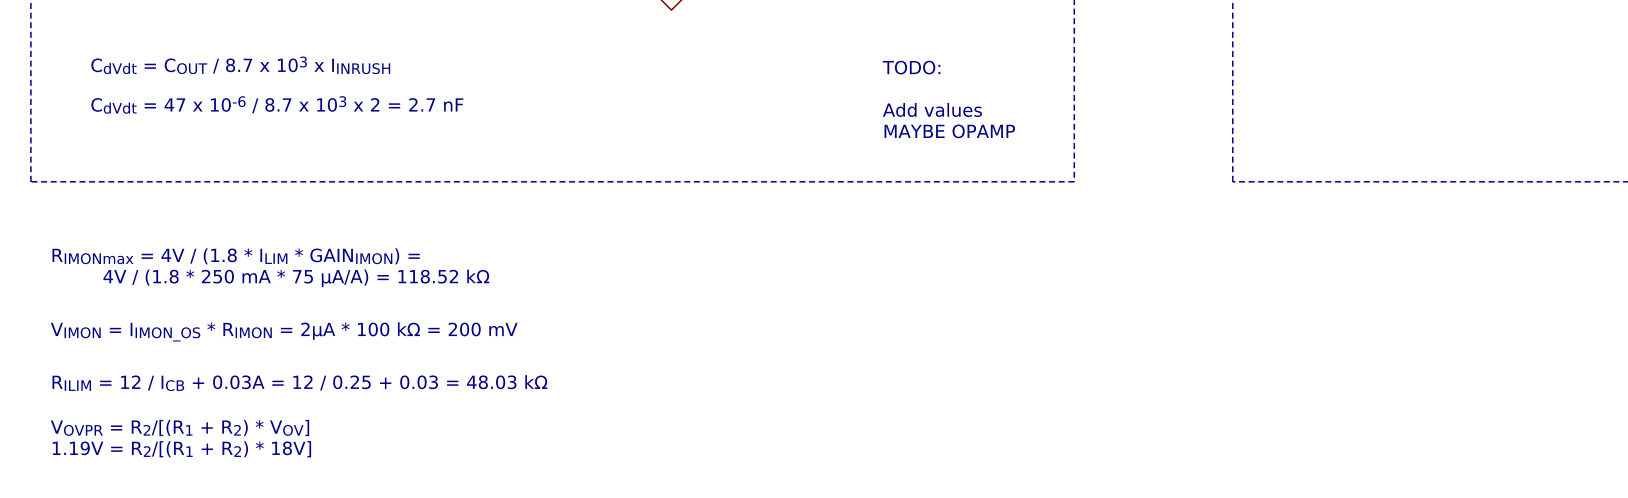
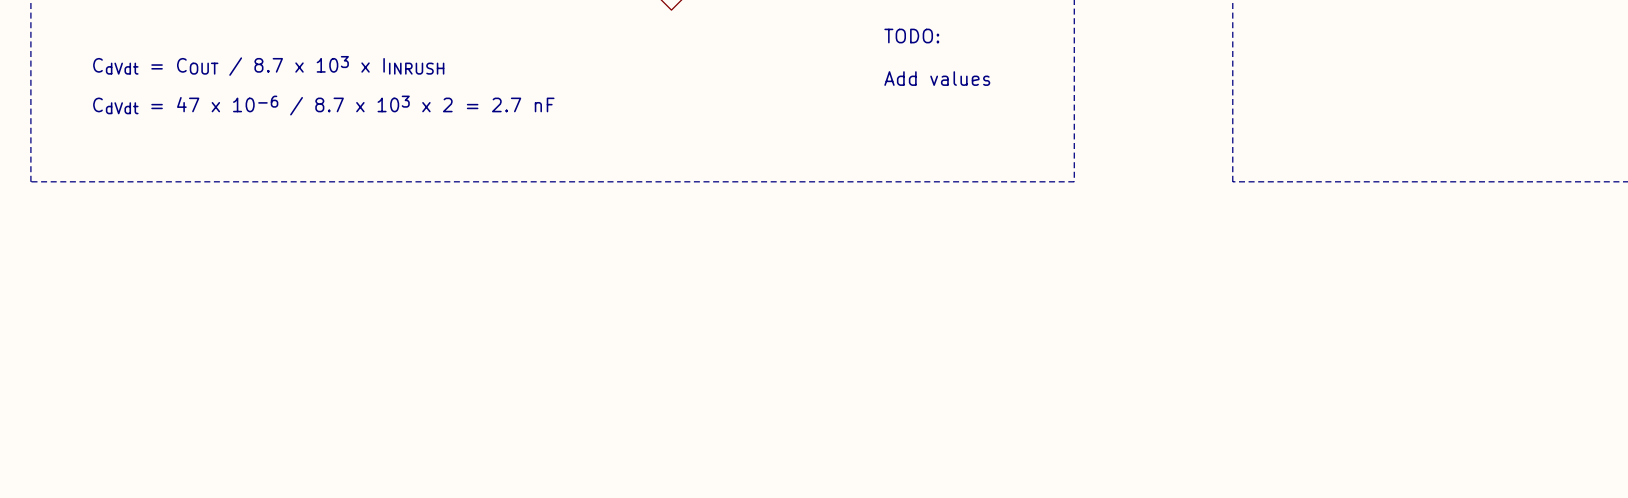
text position: TODO: (911, 67) -> TODO: (911, 36)
text position: Add values (932, 109) -> Add values (937, 78)
text: MAYBE OPAMP (949, 131) -> none
text: RIMONmax = 4V / (1.8 * ILIM * GAINIMON) = (236, 256) -> none
text: 4V / (1.8 * 250 mA * 75 µA/A) = 118.52 kΩ (296, 278) -> none
text: VIMON = IIMON_OS * RIMON = 2µA * 100 kΩ = 200 mV (284, 331) -> none
text: RILIM = 12 / ICB + 0.03A = 12 / 0.25 + 0.03 = 48.03 kΩ (299, 383) -> none
text: VOVPR = R2/[(R1 + R2) * VOV] (180, 427) -> none
text: 1.19V = R2/[(R1 + R2) * 18V] (181, 449) -> none

